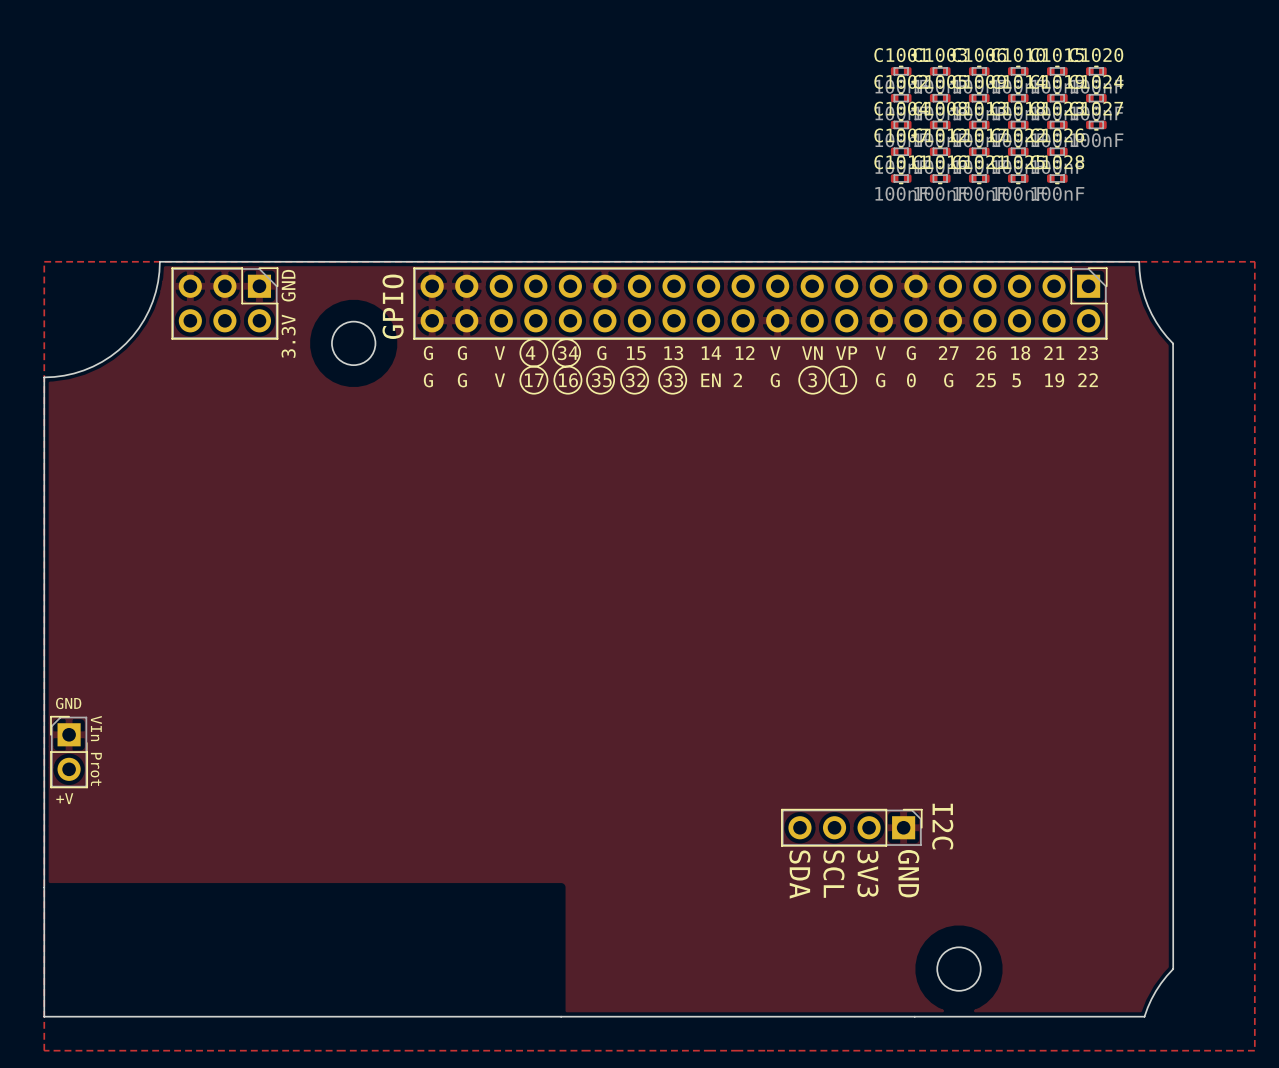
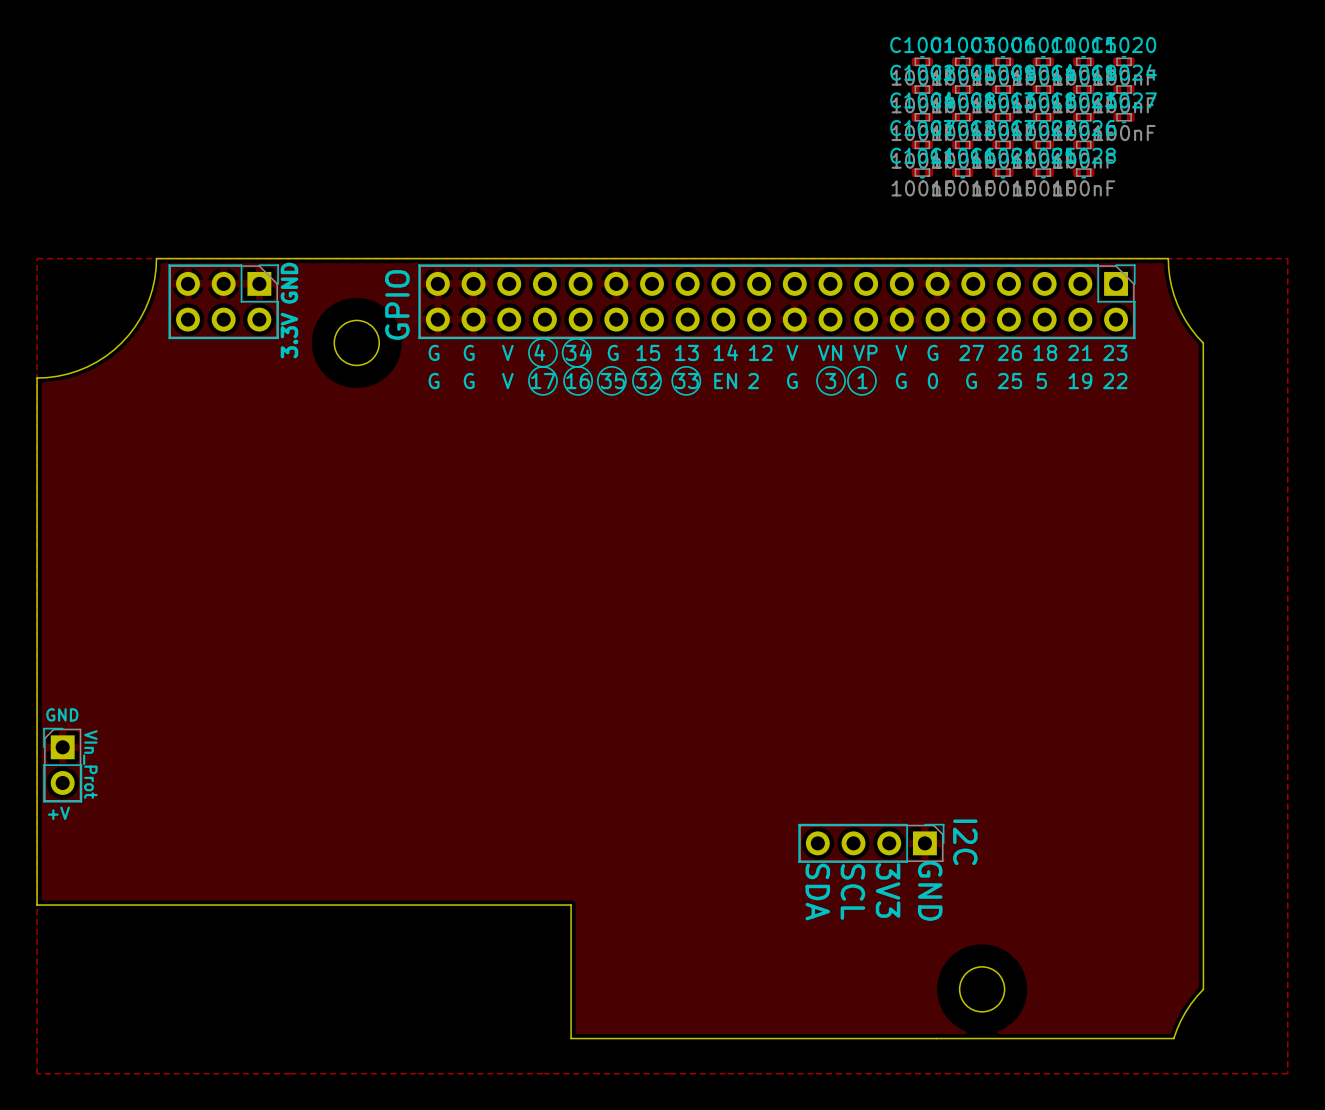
board edge: (44, 887) (44, 1016) (561, 1016) -> (37, 905) (571, 905) (571, 1038)

